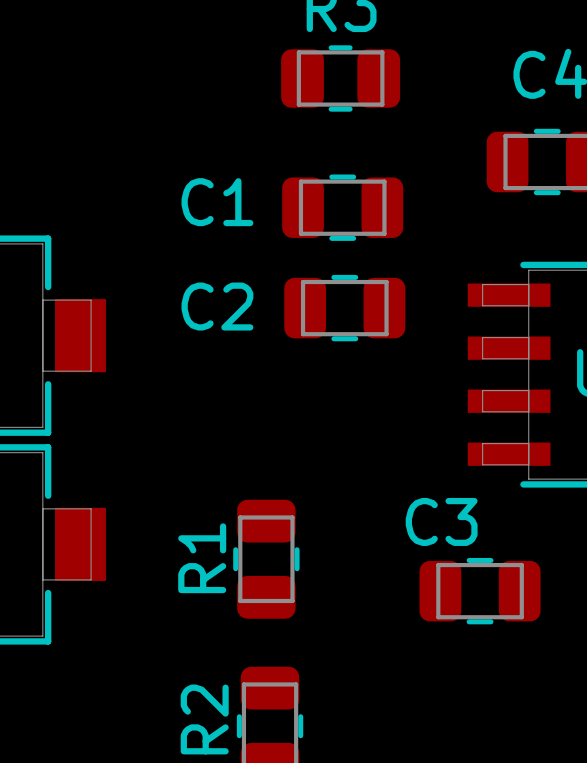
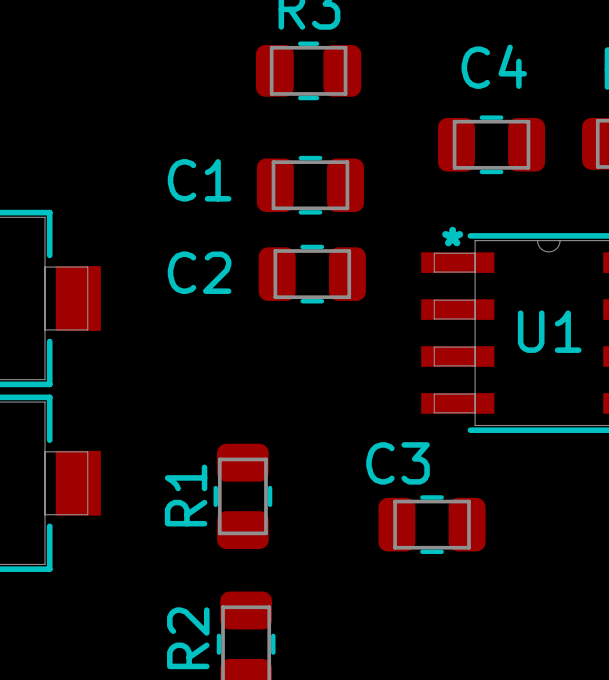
text: none -> * (452, 236)

